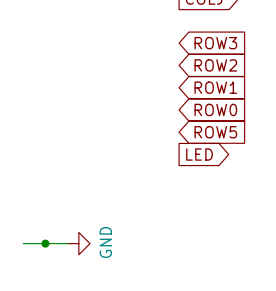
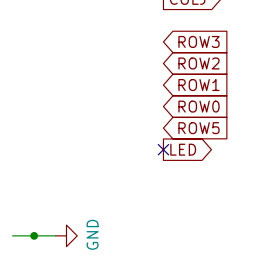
no-connect mark: none -> (163, 149)

